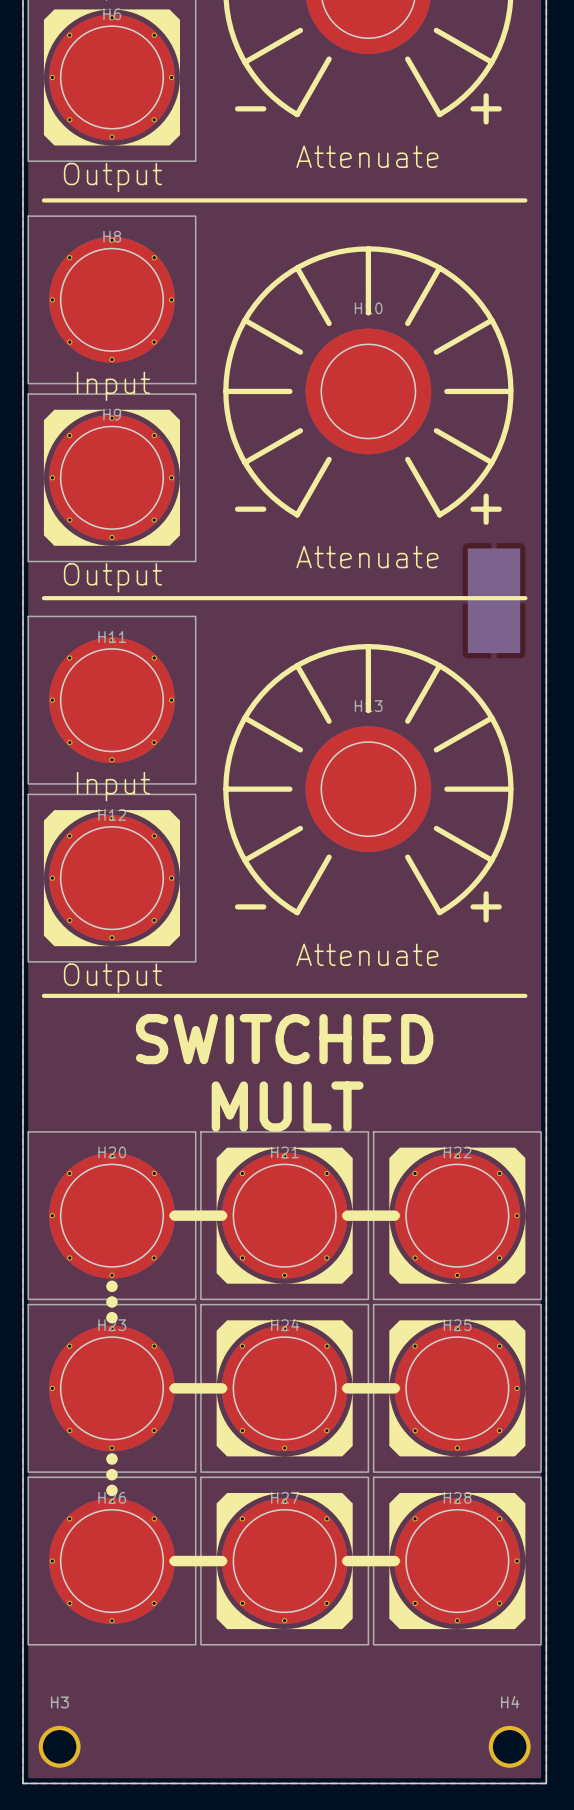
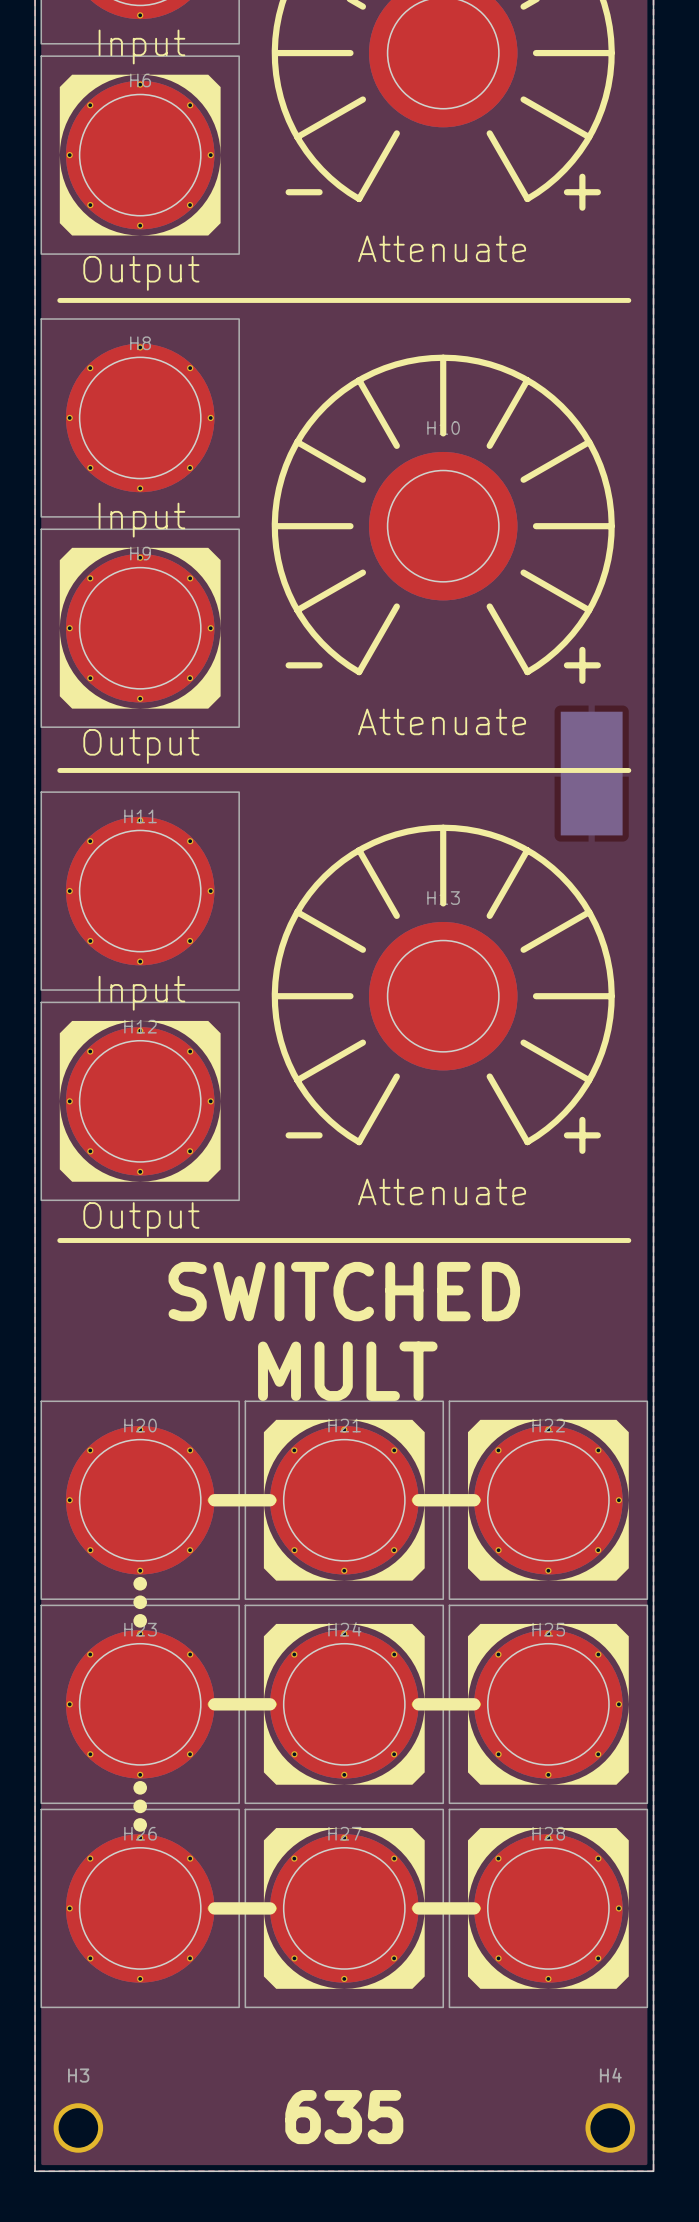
text: none -> 635 (344, 2117)

